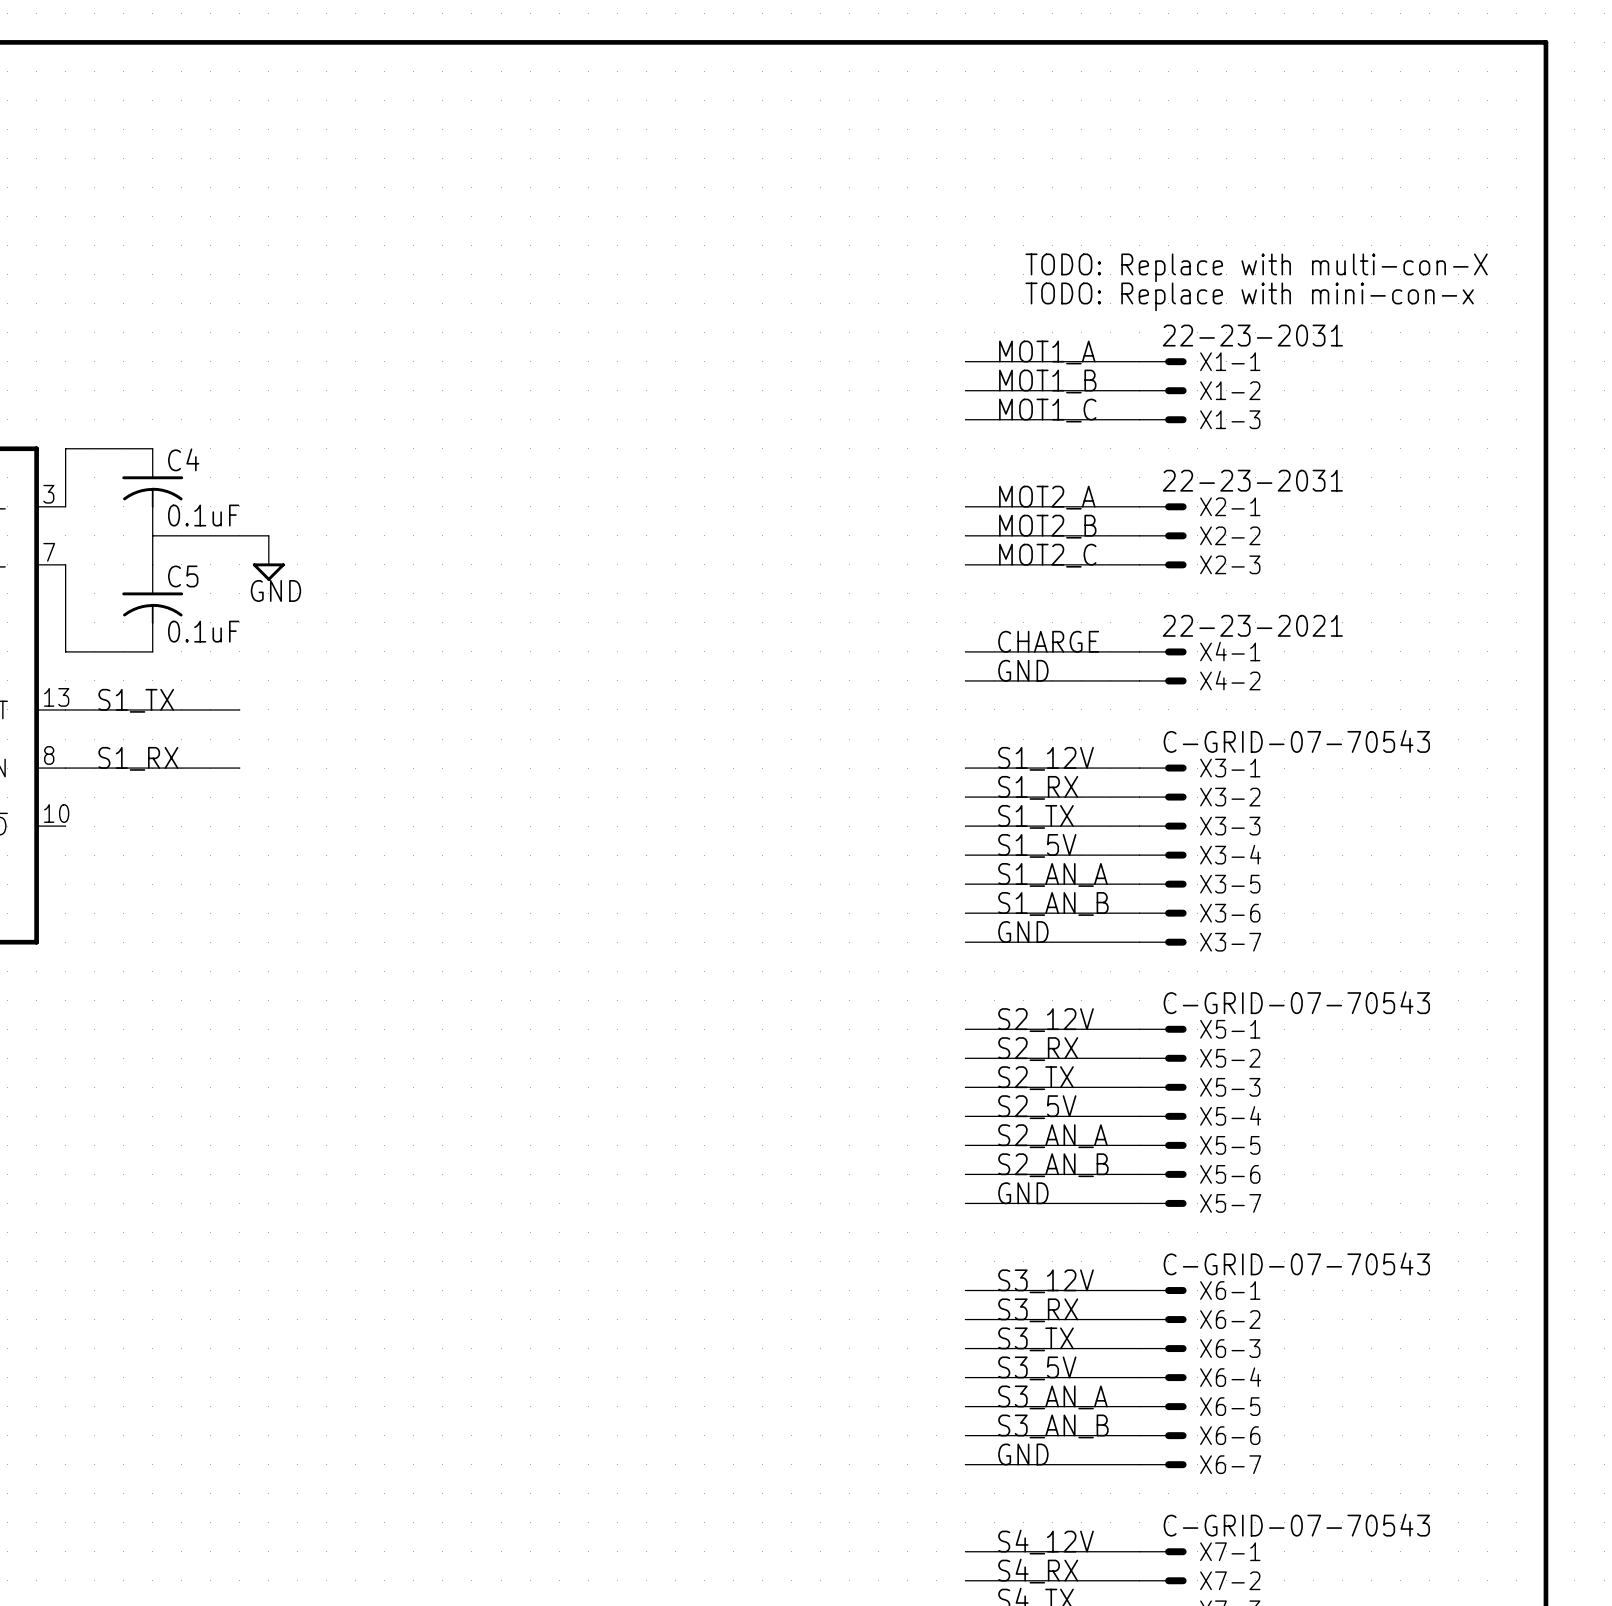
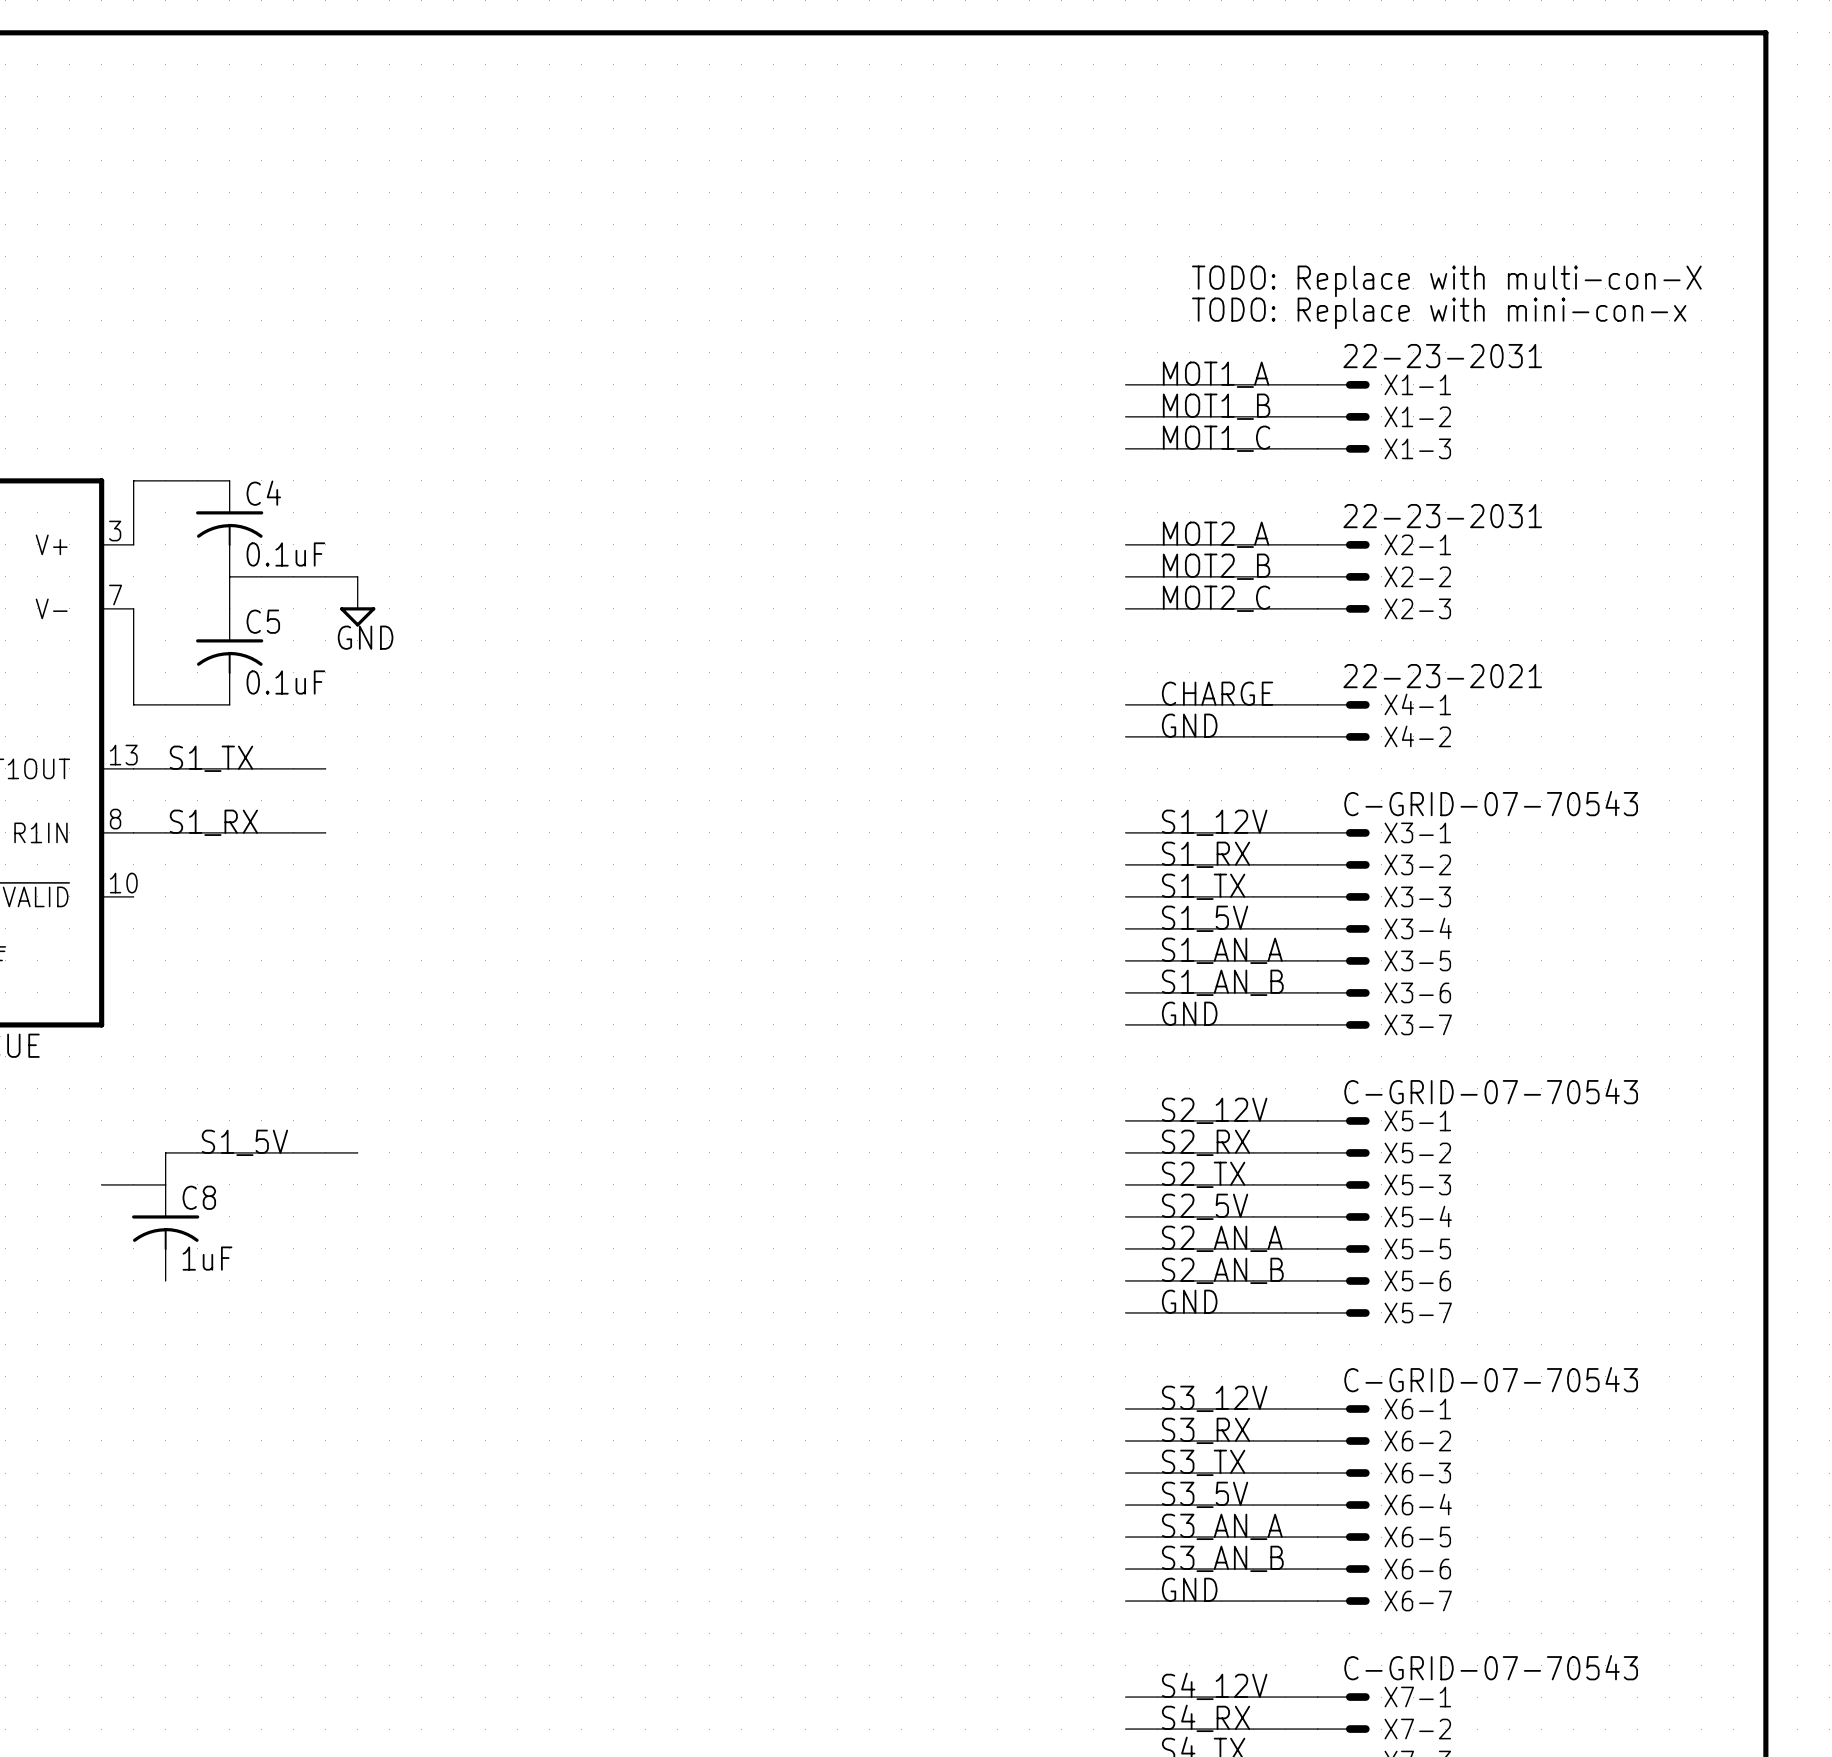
label: none -> S1_5V (244, 1142)
wire: none -> (357, 1152) (165, 1152) (165, 1184) (101, 1184)
C8: none -> 1uF (165, 1232)

